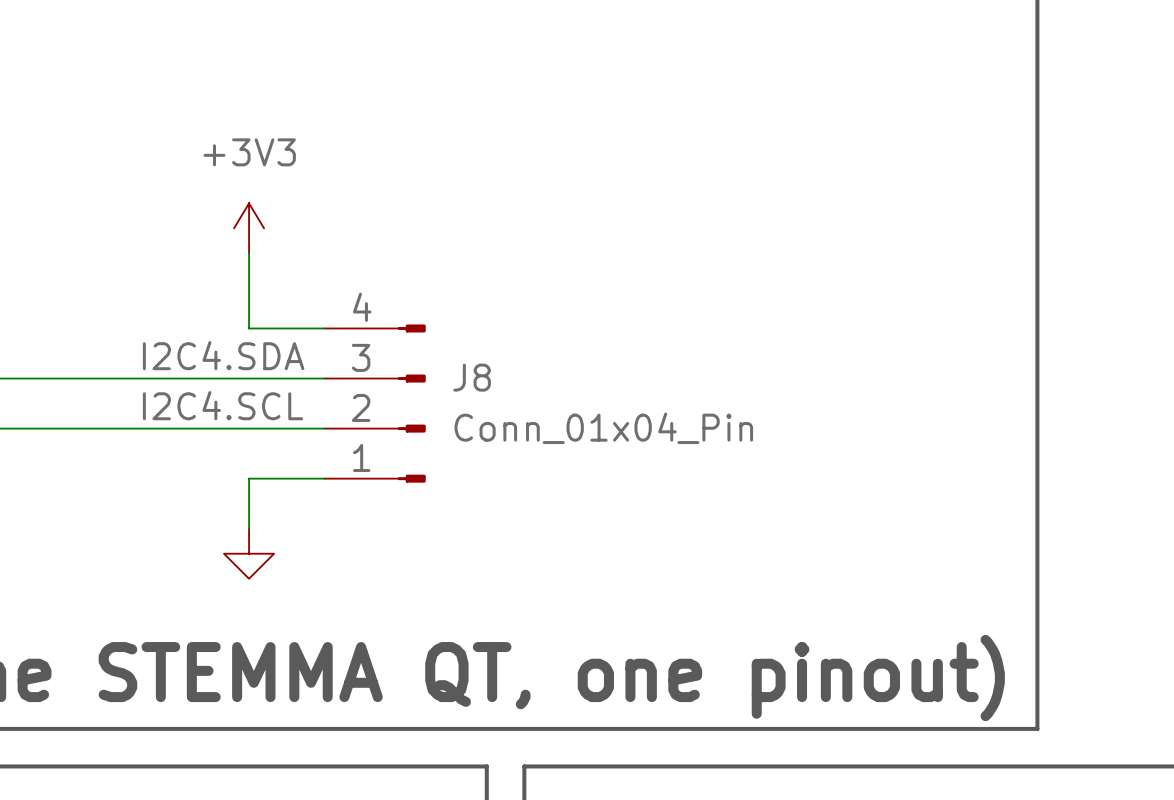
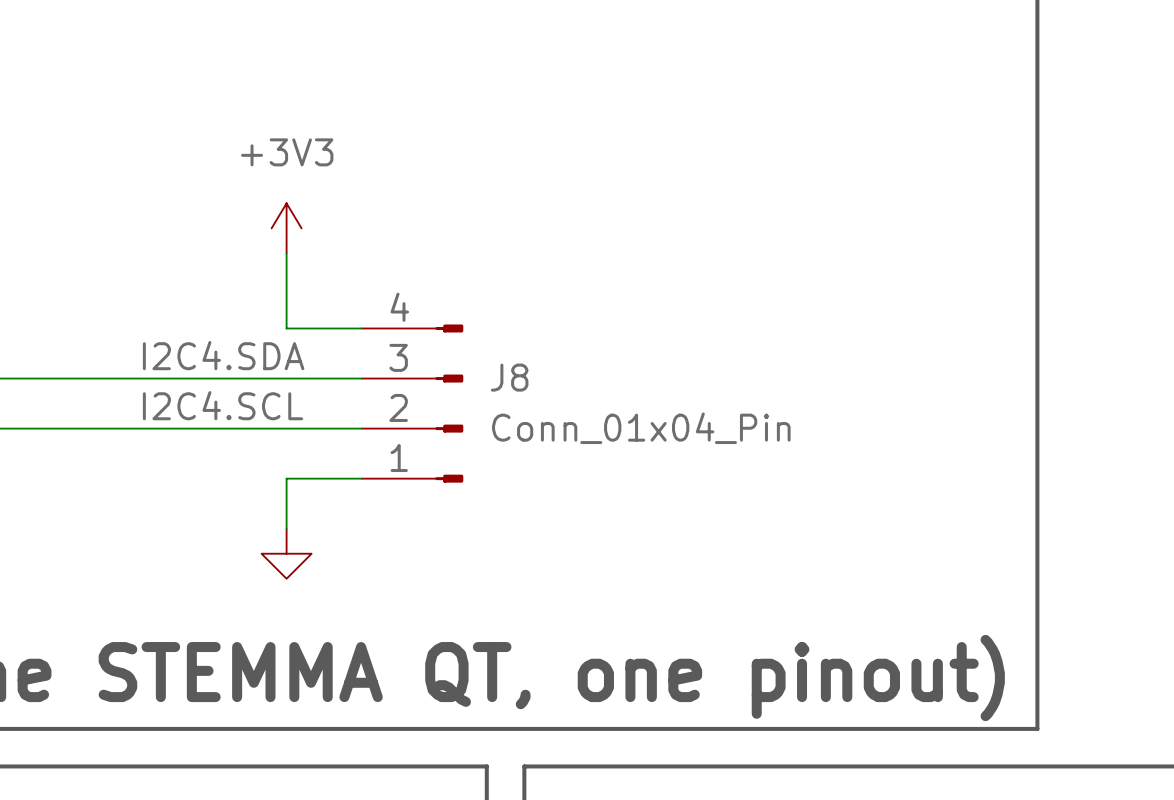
power symbol position: +3V3 (249, 228) -> +3V3 (286, 228)
wire: (249, 253) (249, 328) (286, 328) -> (286, 253) (286, 328)
J8 position: (374, 403) -> (412, 403)
wire: (286, 478) (249, 478) (249, 528) -> (286, 478) (286, 528)
power symbol position: (249, 553) -> (286, 553)

